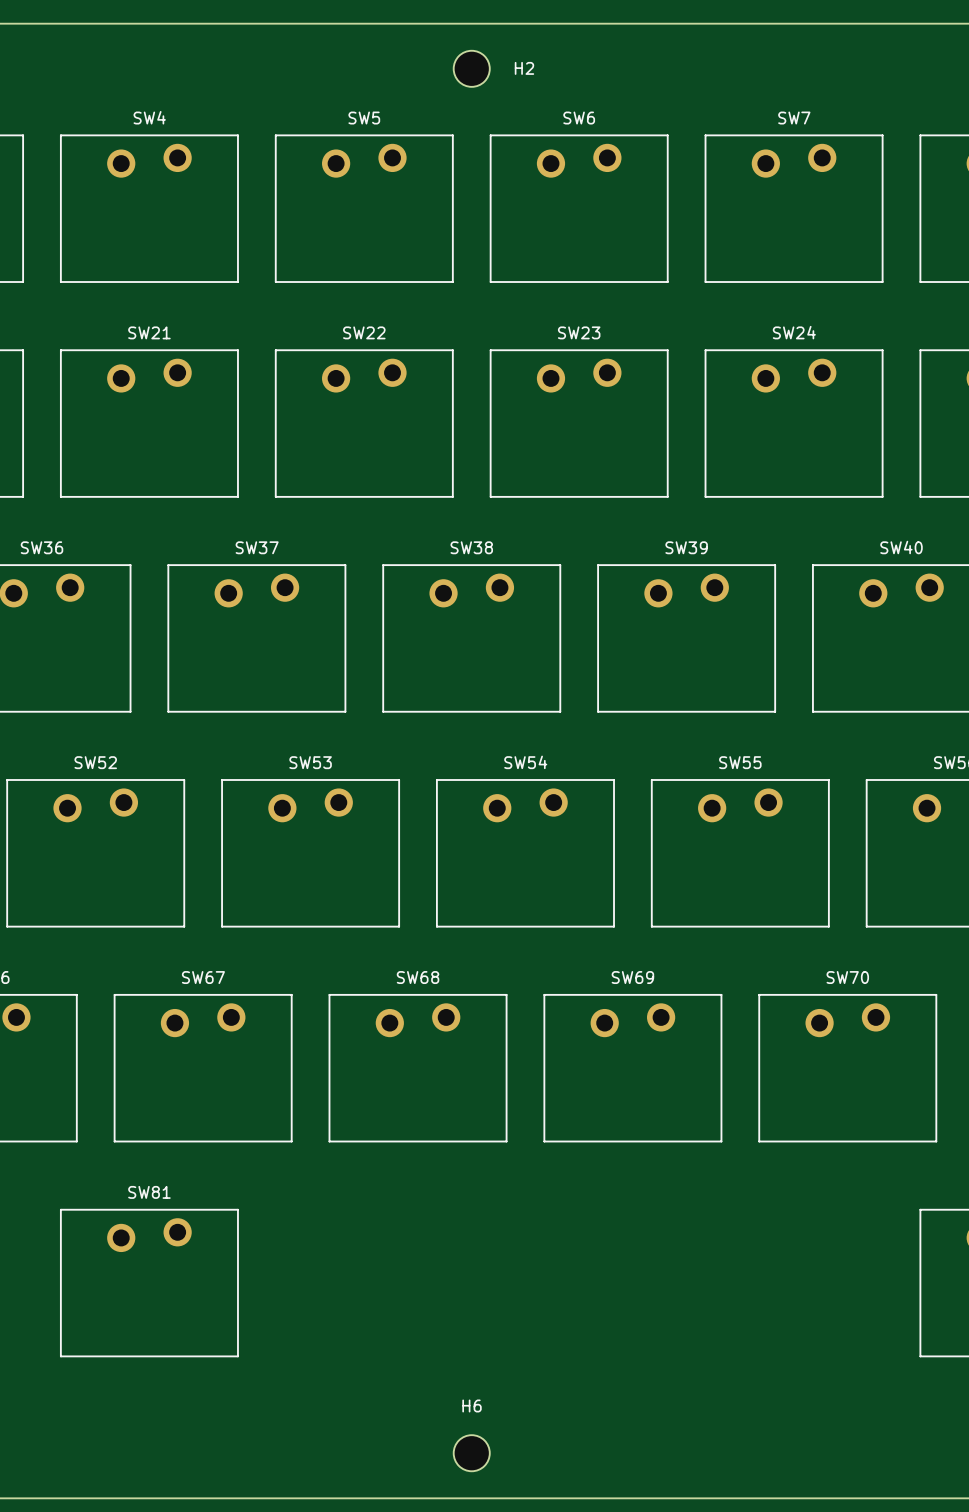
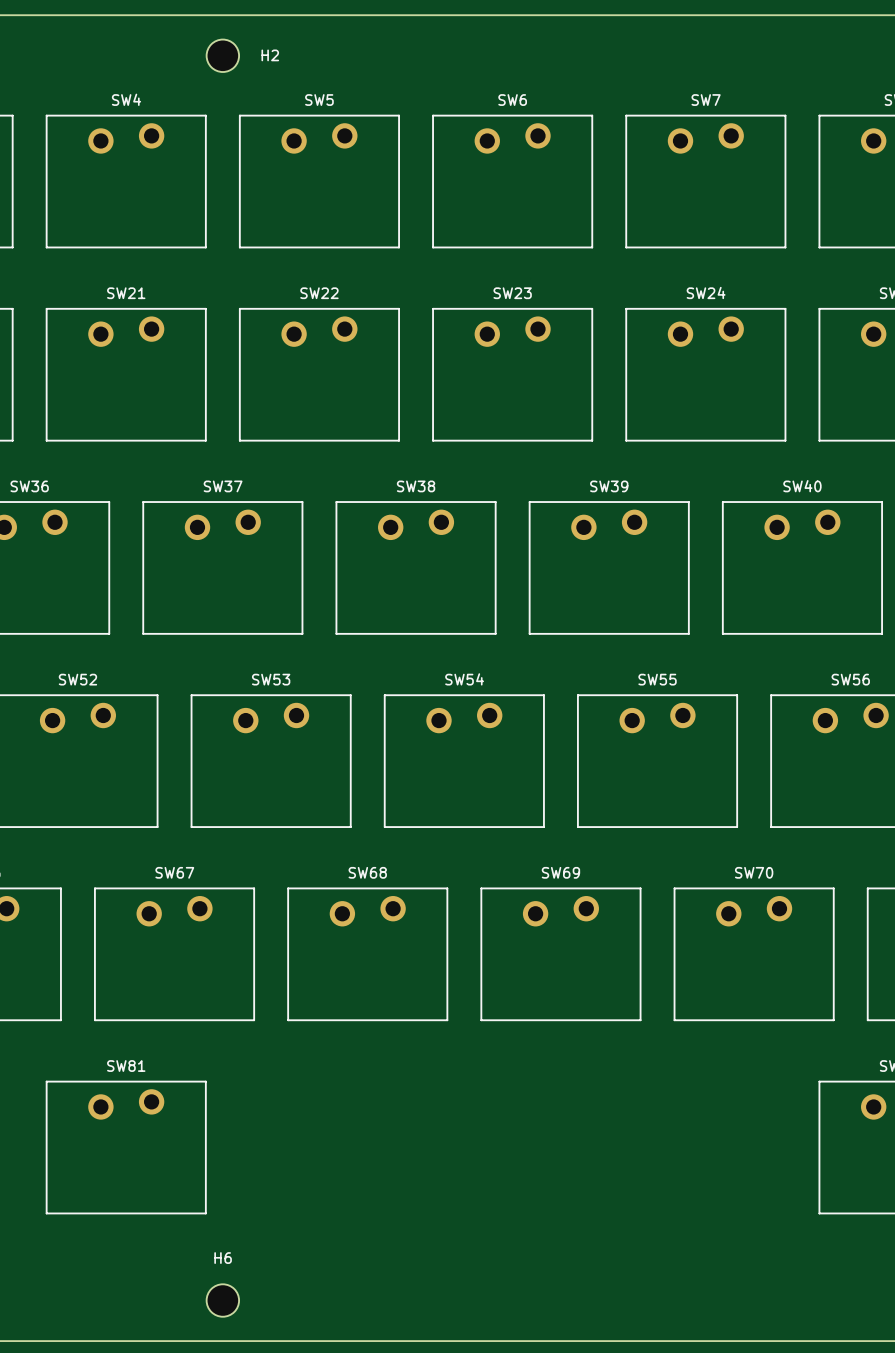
H2 position: (471, 68) -> (222, 55)
H6 position: (471, 1453) -> (222, 1300)

